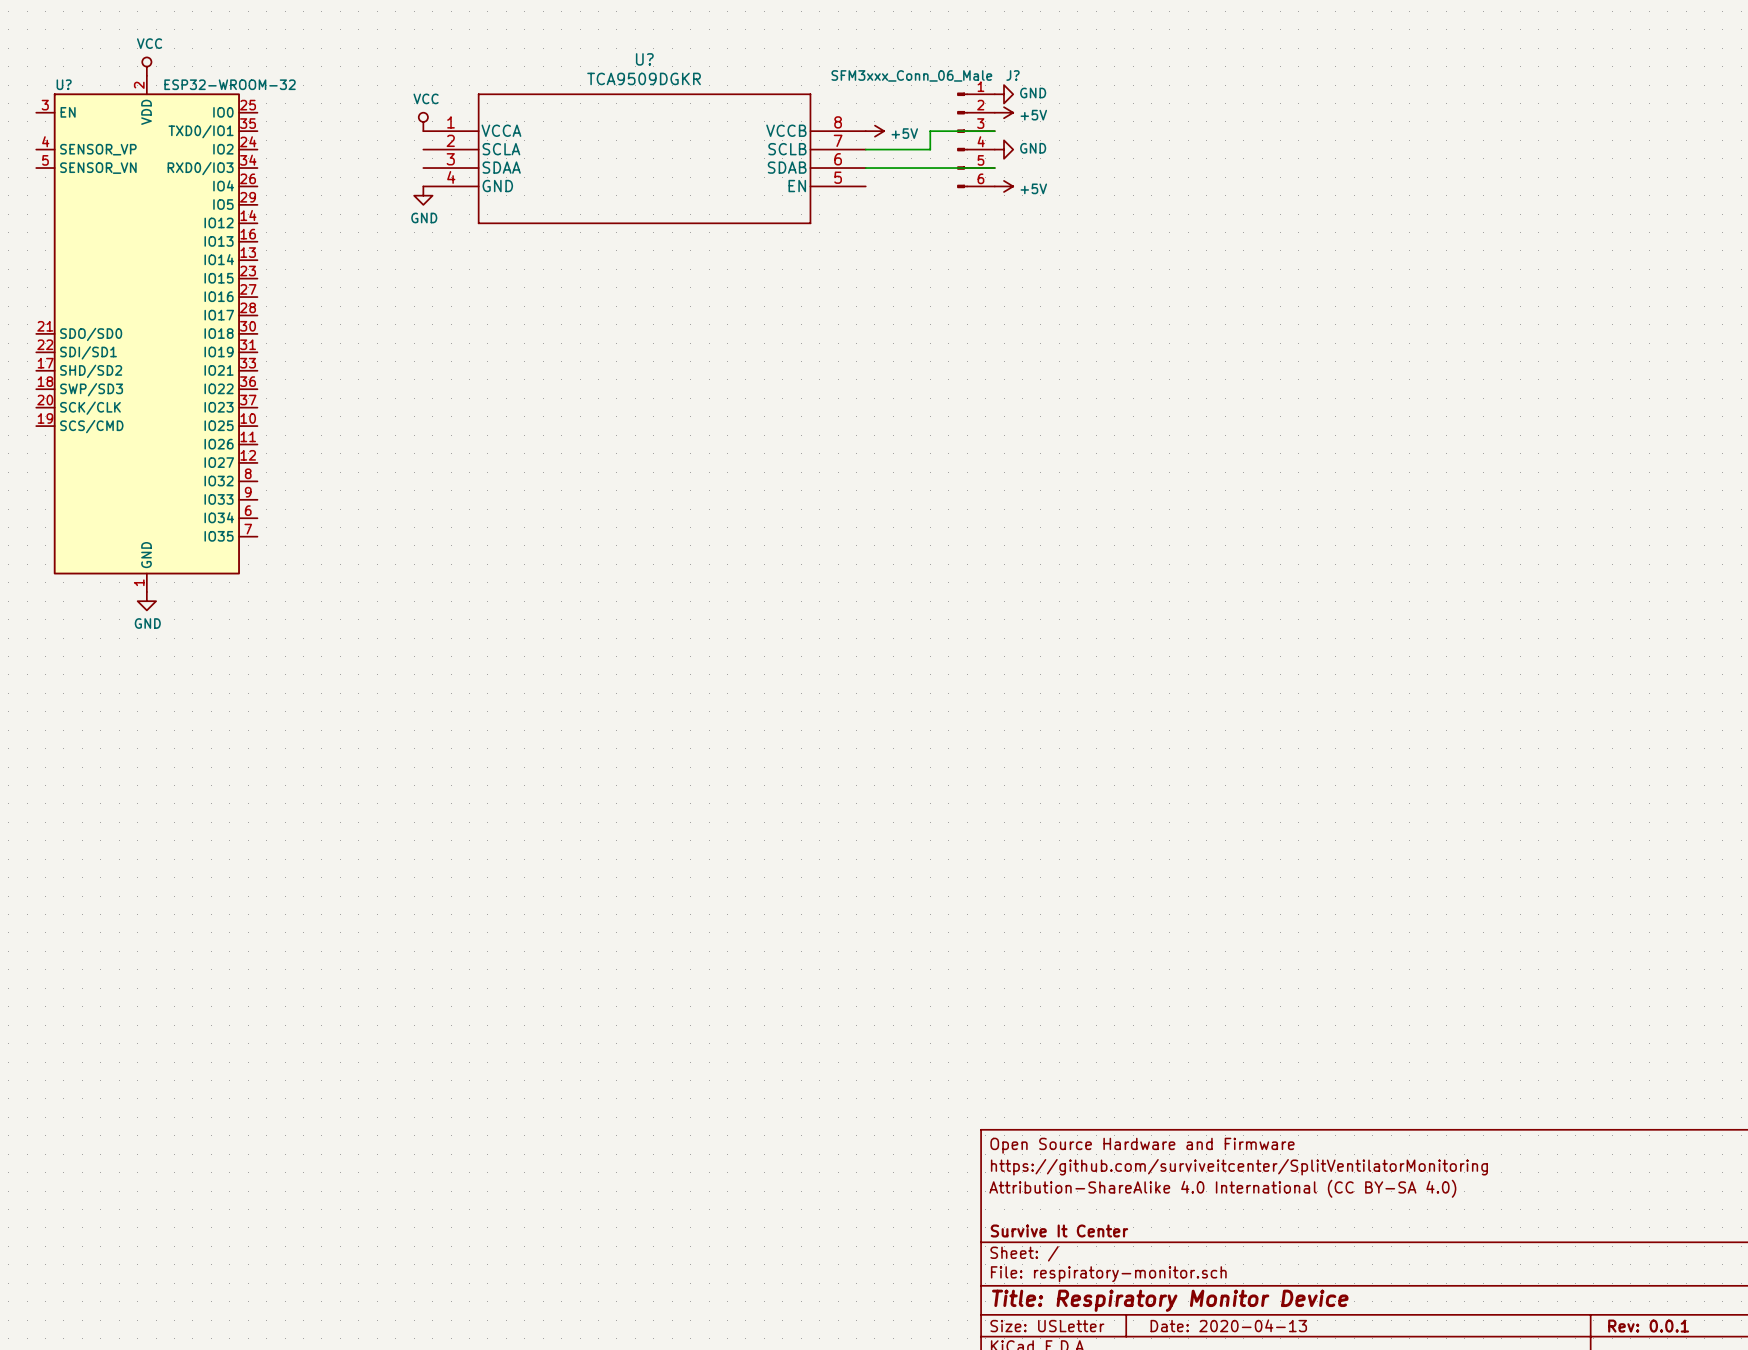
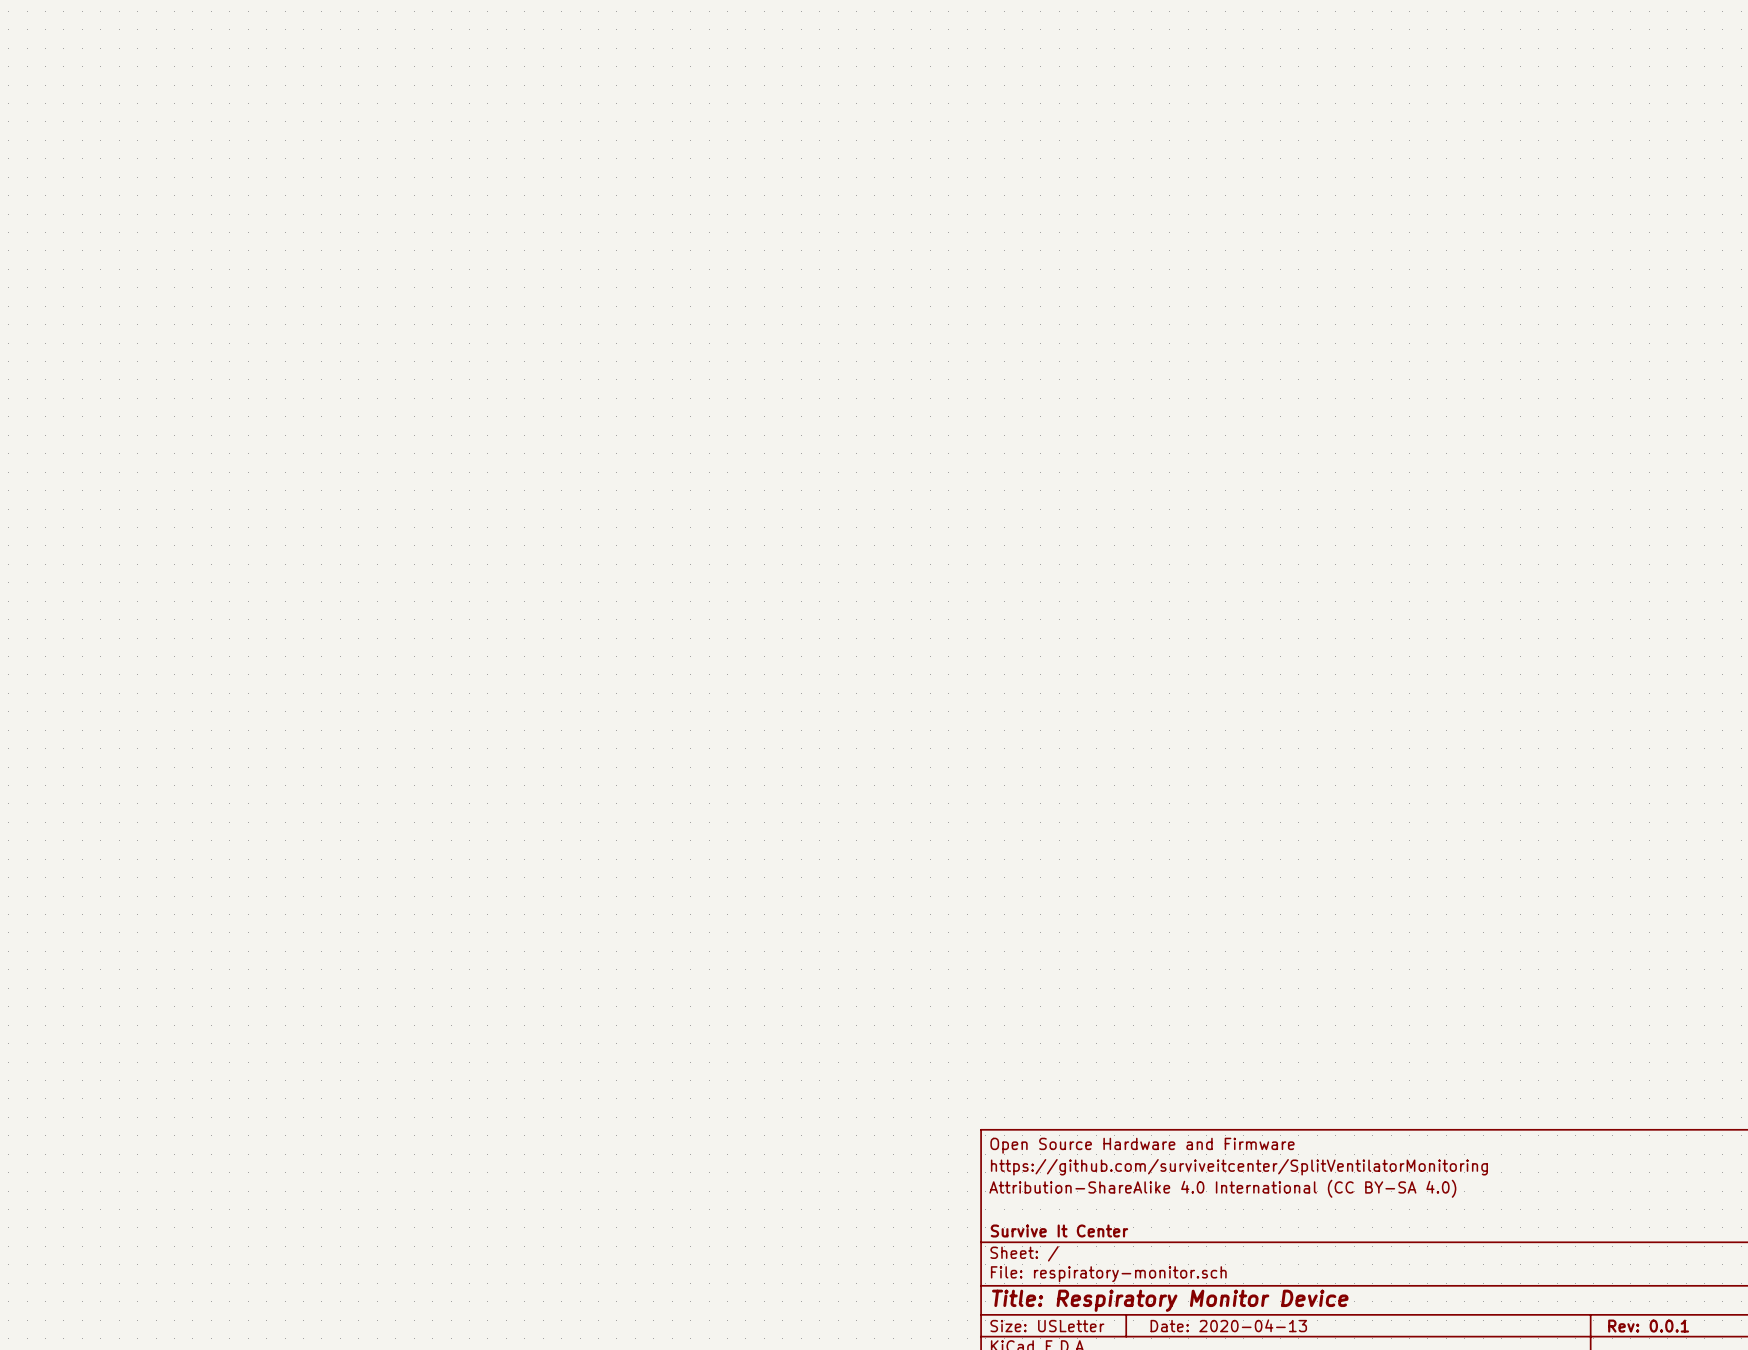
power symbol: VCC (146, 66) -> none
power symbol: GND (1004, 94) -> none
power symbol: +5V (1004, 112) -> none
power symbol: VCC (423, 121) -> none
power symbol: +5V (874, 131) -> none
wire: (994, 131) (930, 131) (930, 149) (865, 149) -> none
J?: SFM3xxx_Conn_06_Male (976, 140) -> none
power symbol: GND (1004, 149) -> none
U?: TCA9509DGKR (644, 158) -> none
wire: (865, 168) (994, 168) -> none
power symbol: +5V (1004, 186) -> none
power symbol: GND (423, 195) -> none
U?: ESP32-WROOM-32 (146, 333) -> none
power symbol: GND (146, 601) -> none

